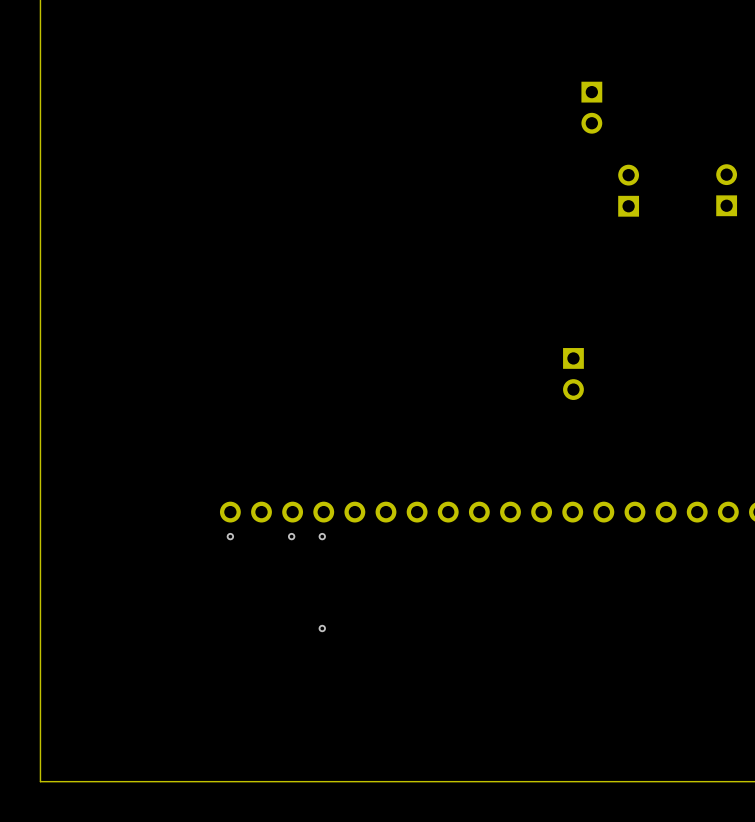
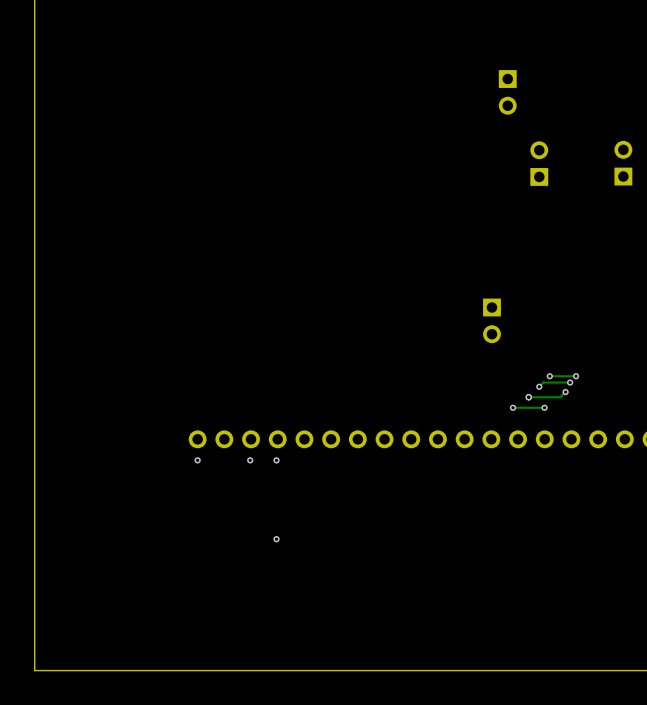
via: none -> (549, 376)
track: none -> (576, 376) (549, 376)
via: none -> (576, 376)
track: none -> (570, 382) (543, 382) (539, 386)
via: none -> (570, 382)
via: none -> (539, 386)
track: none -> (565, 392) (560, 397) (528, 397)
via: none -> (565, 392)
via: none -> (528, 397)
via: none -> (513, 407)
track: none -> (544, 407) (513, 407)
via: none -> (544, 407)

